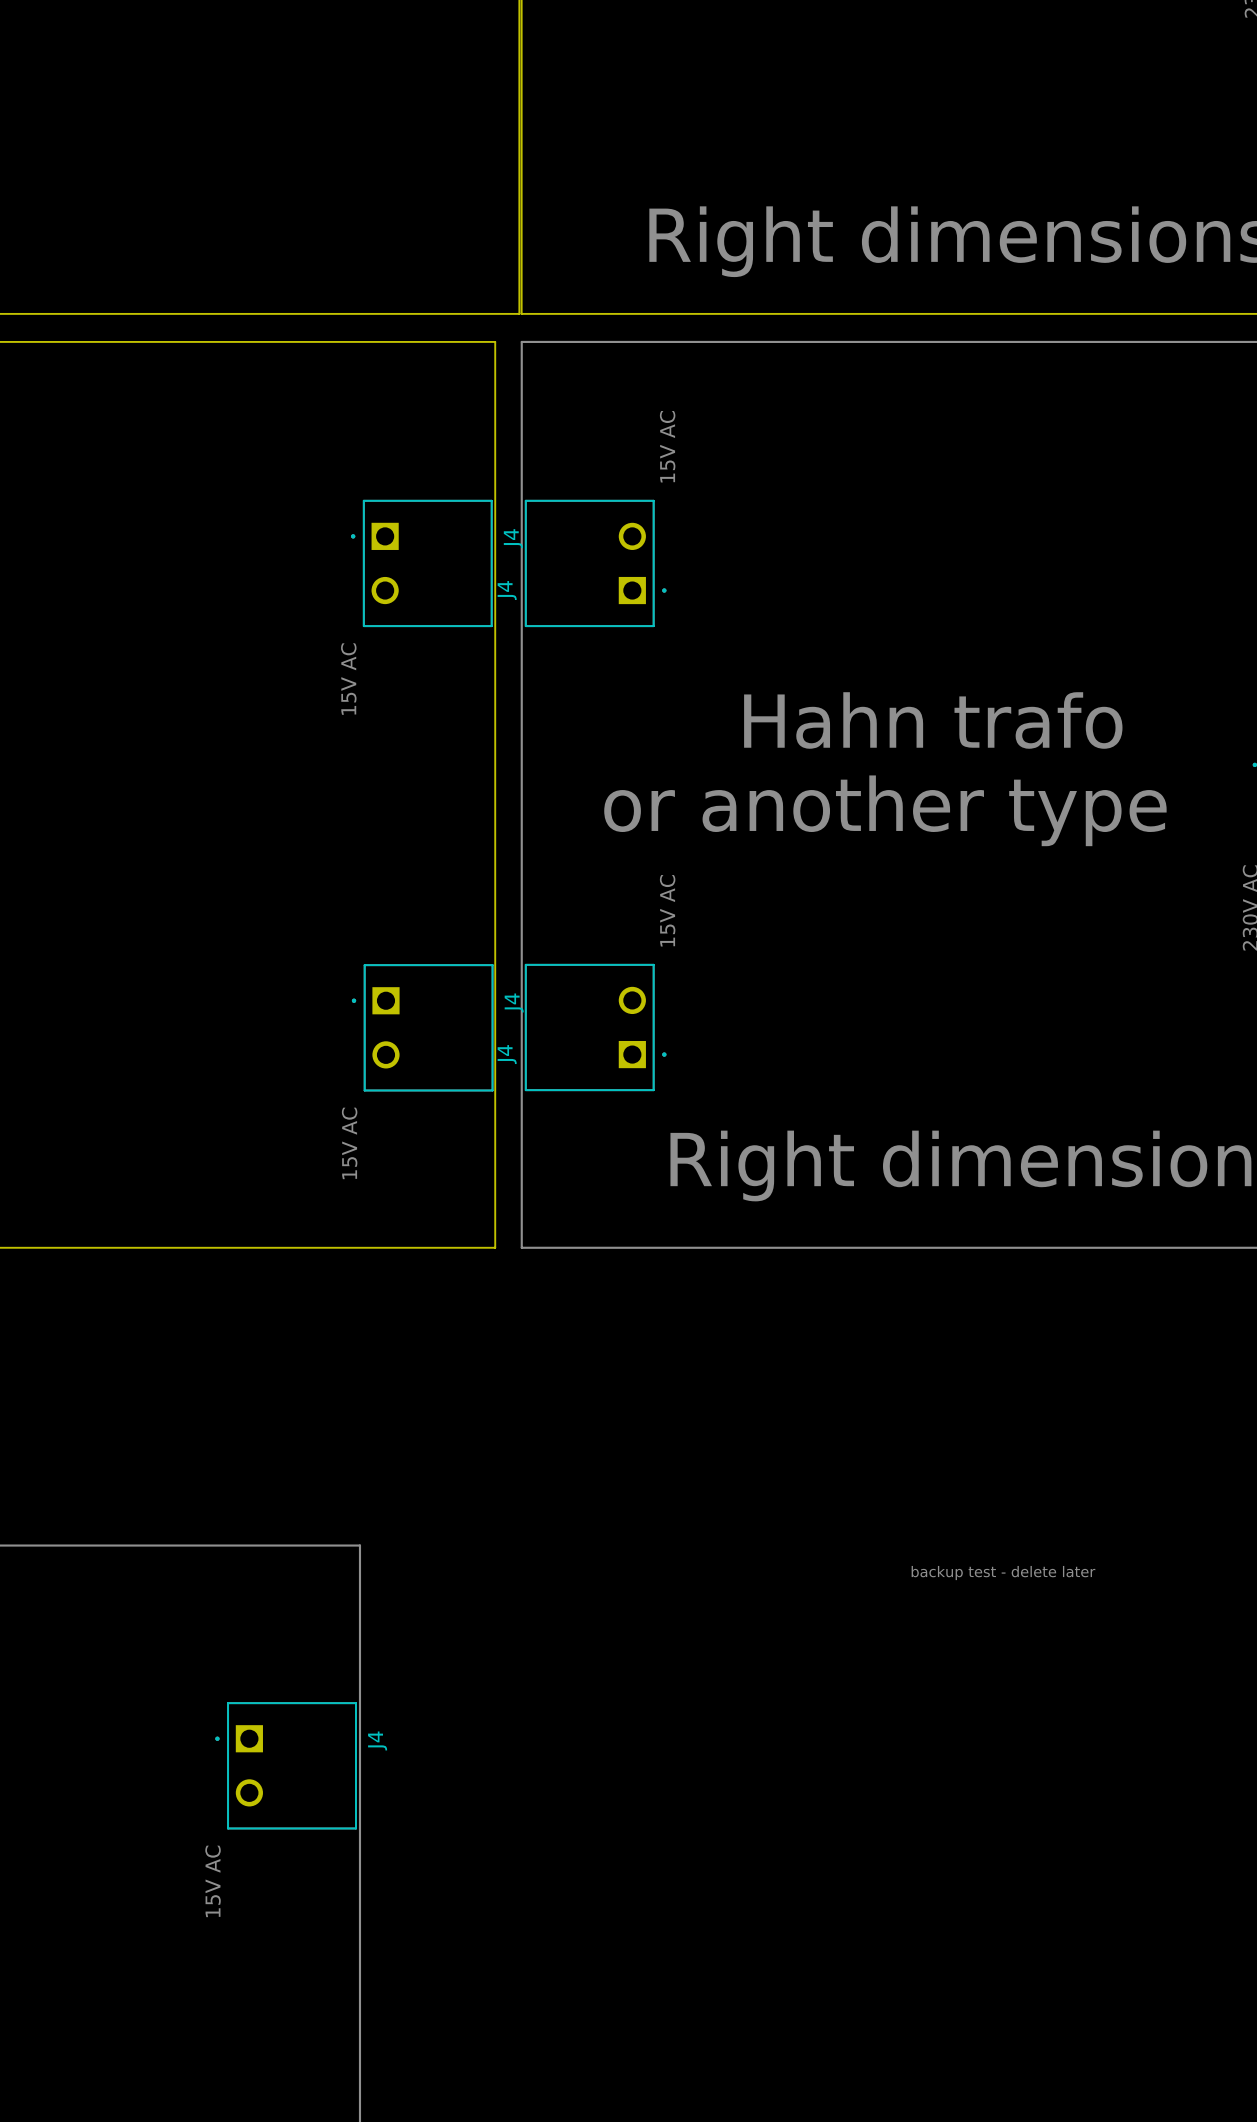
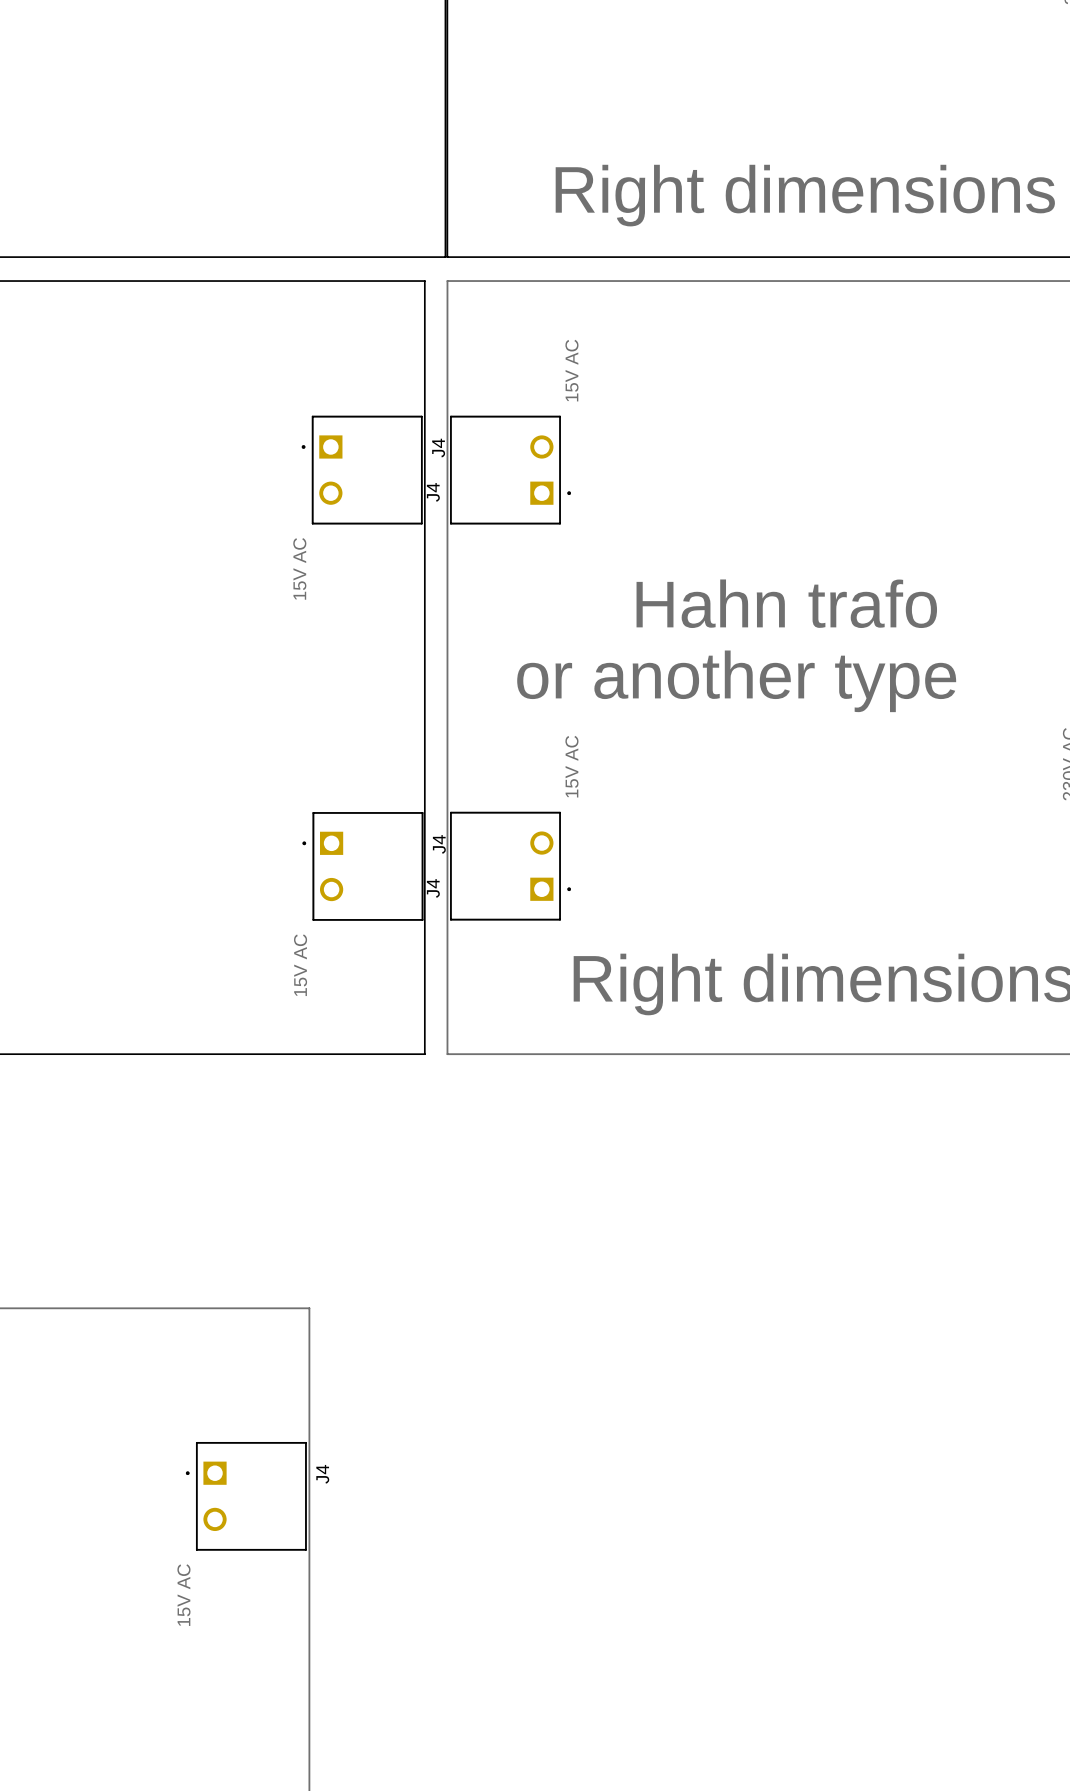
text: backup test - delete later (1003, 1573) -> none

